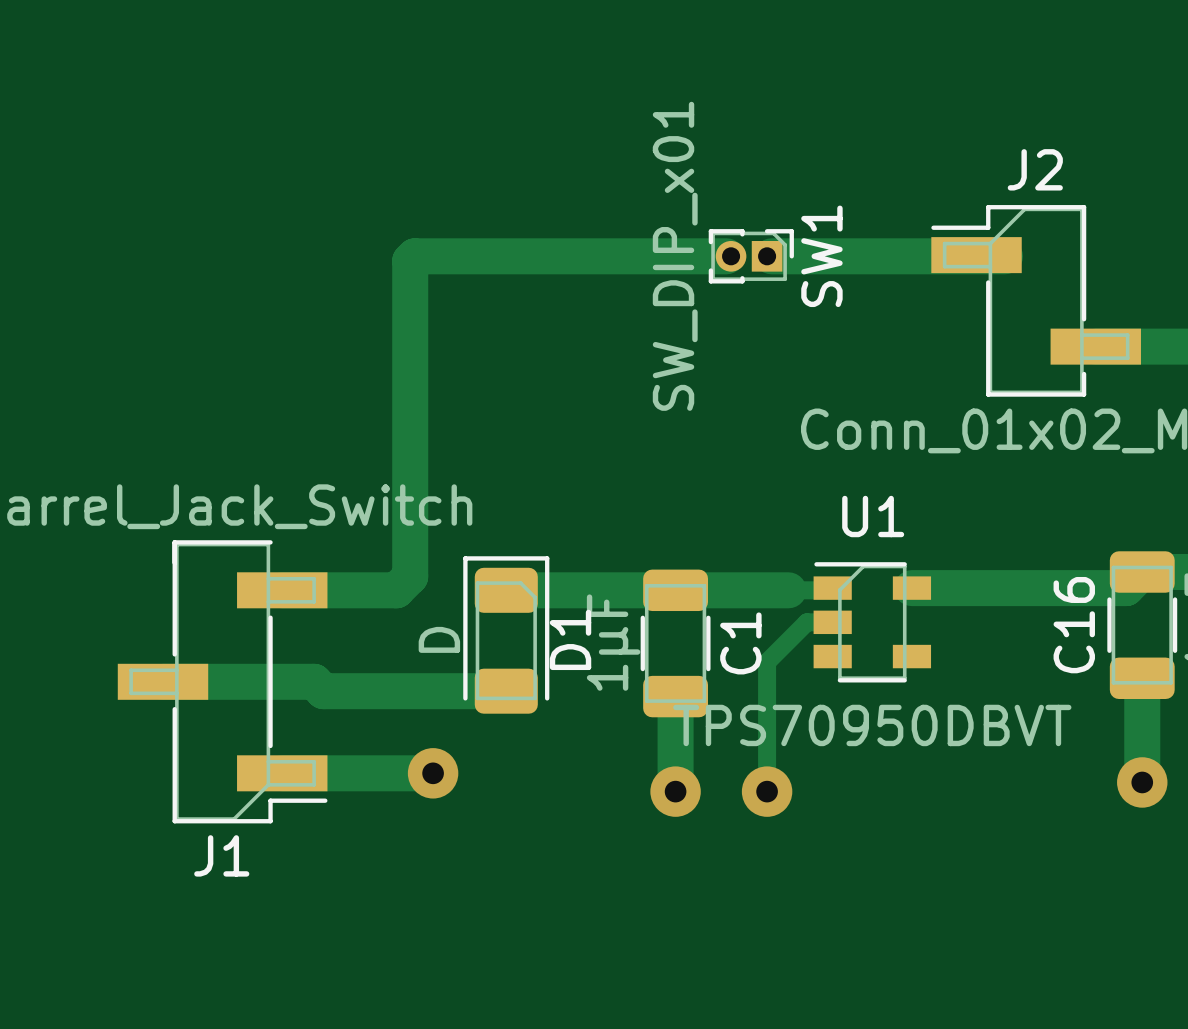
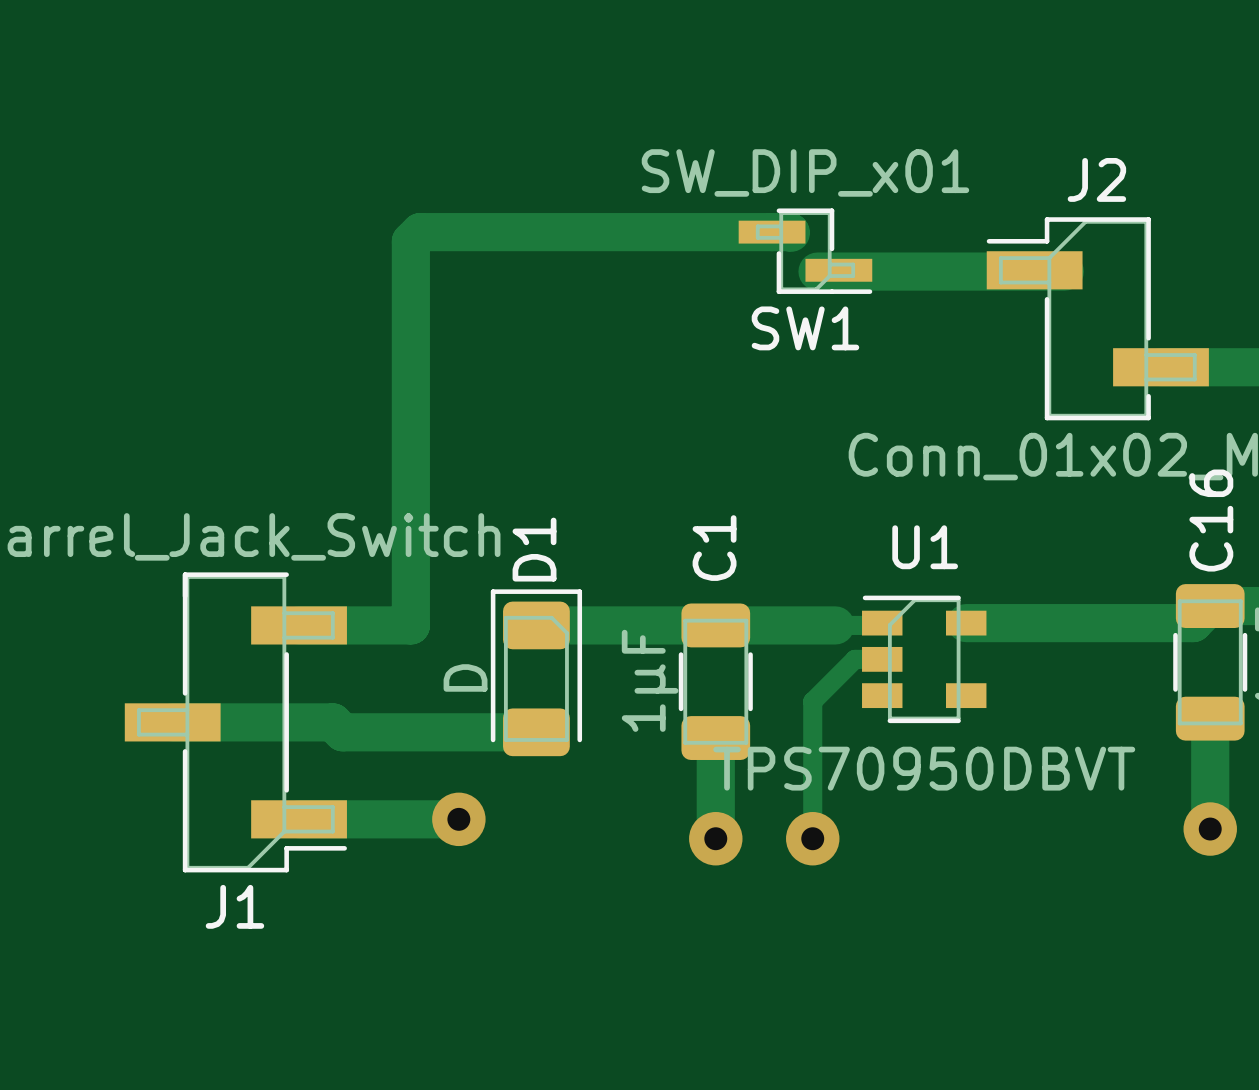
SW1 footprint: [708, 229, 794, 284] -> [738, 208, 873, 294]
SW1 value position: SW_DIP_x01 (675, 256) -> SW_DIP_x01 (805, 172)
track: (726, 256) (414, 256) (410, 260) (410, 576) (396, 590) (387, 590) -> (790, 232) (420, 232) (410, 241) (410, 625)
SW1 name position: SW1 (821, 256) -> SW1 (805, 328)
C16 name position: C16 (1074, 625) -> C16 (1211, 520)
D1 name position: D1 (570, 639) -> D1 (534, 549)
C1 name position: C1 (740, 643) -> C1 (714, 548)

